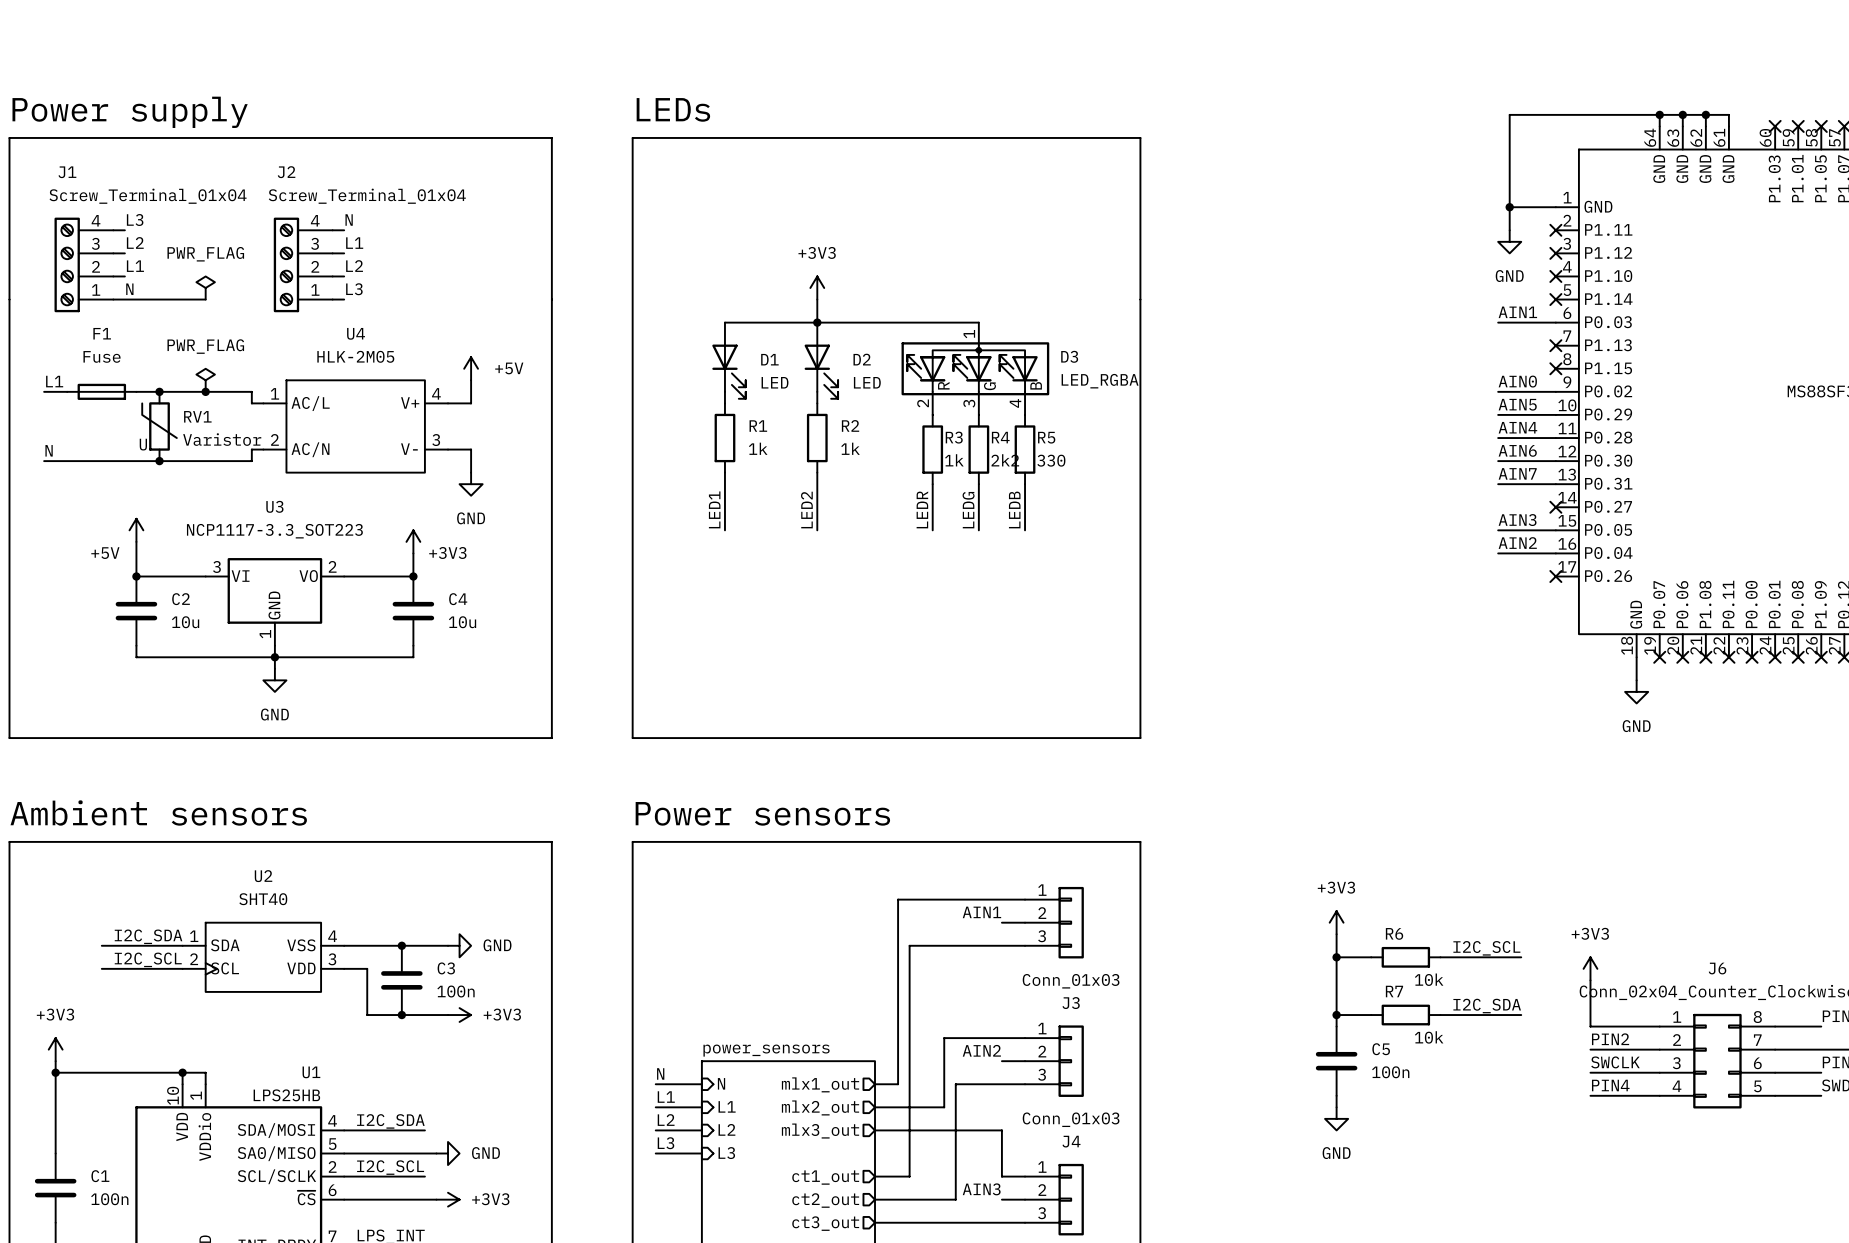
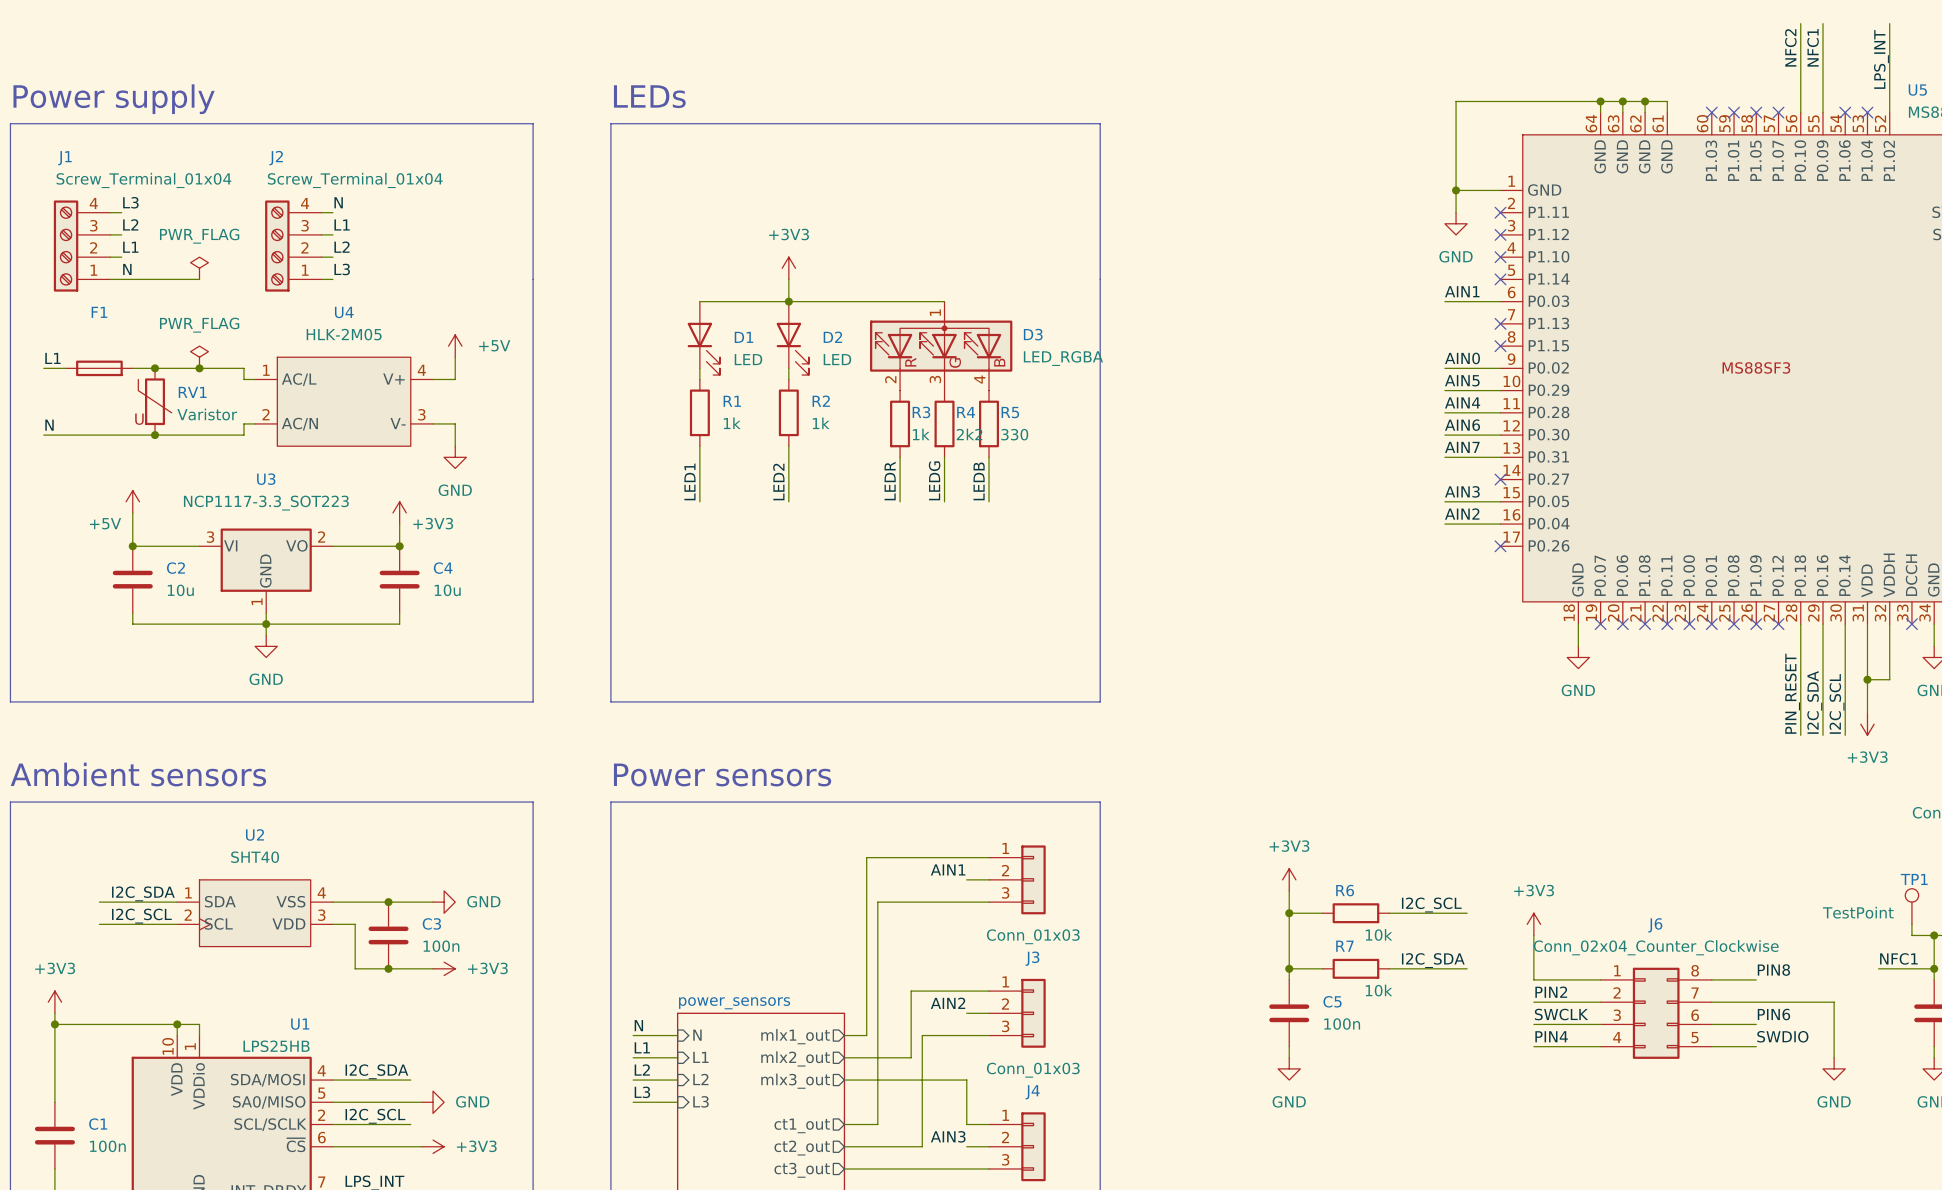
F1 value: Fuse (102, 356) -> none

